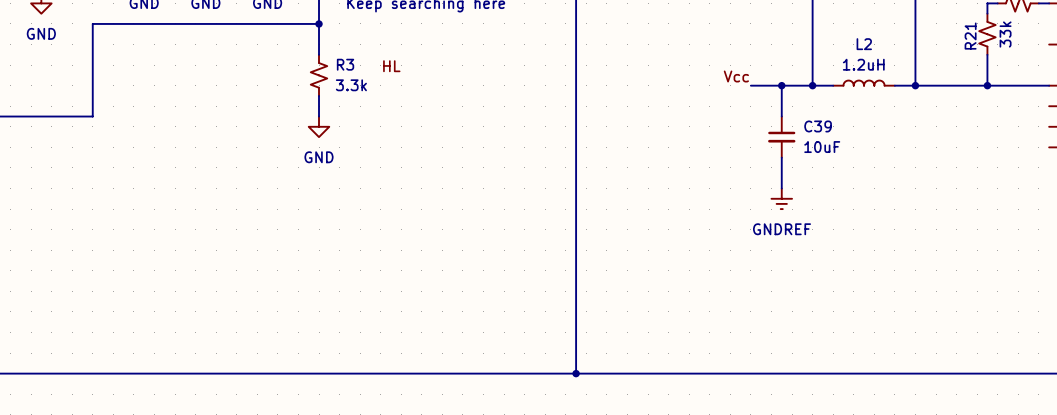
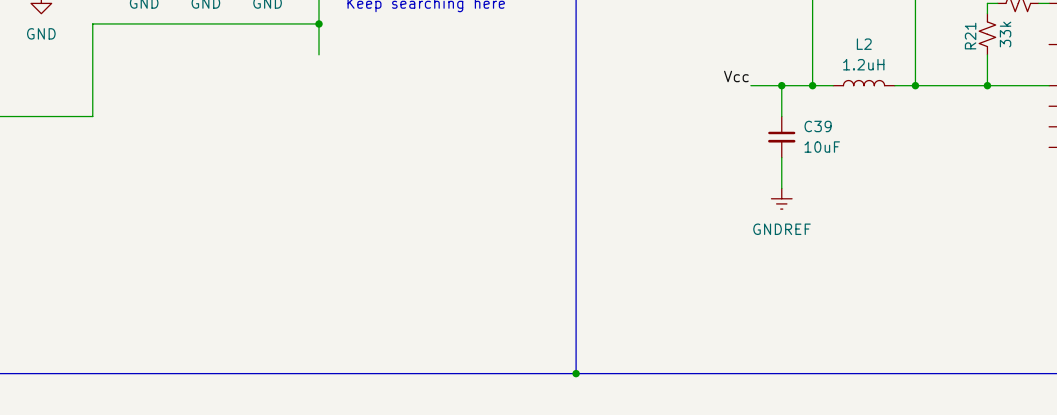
label: HL (391, 66) -> none
R3: 3.3k (319, 75) -> none
wire: (319, 95) (319, 116) -> none
power symbol: GND (319, 126) -> none

